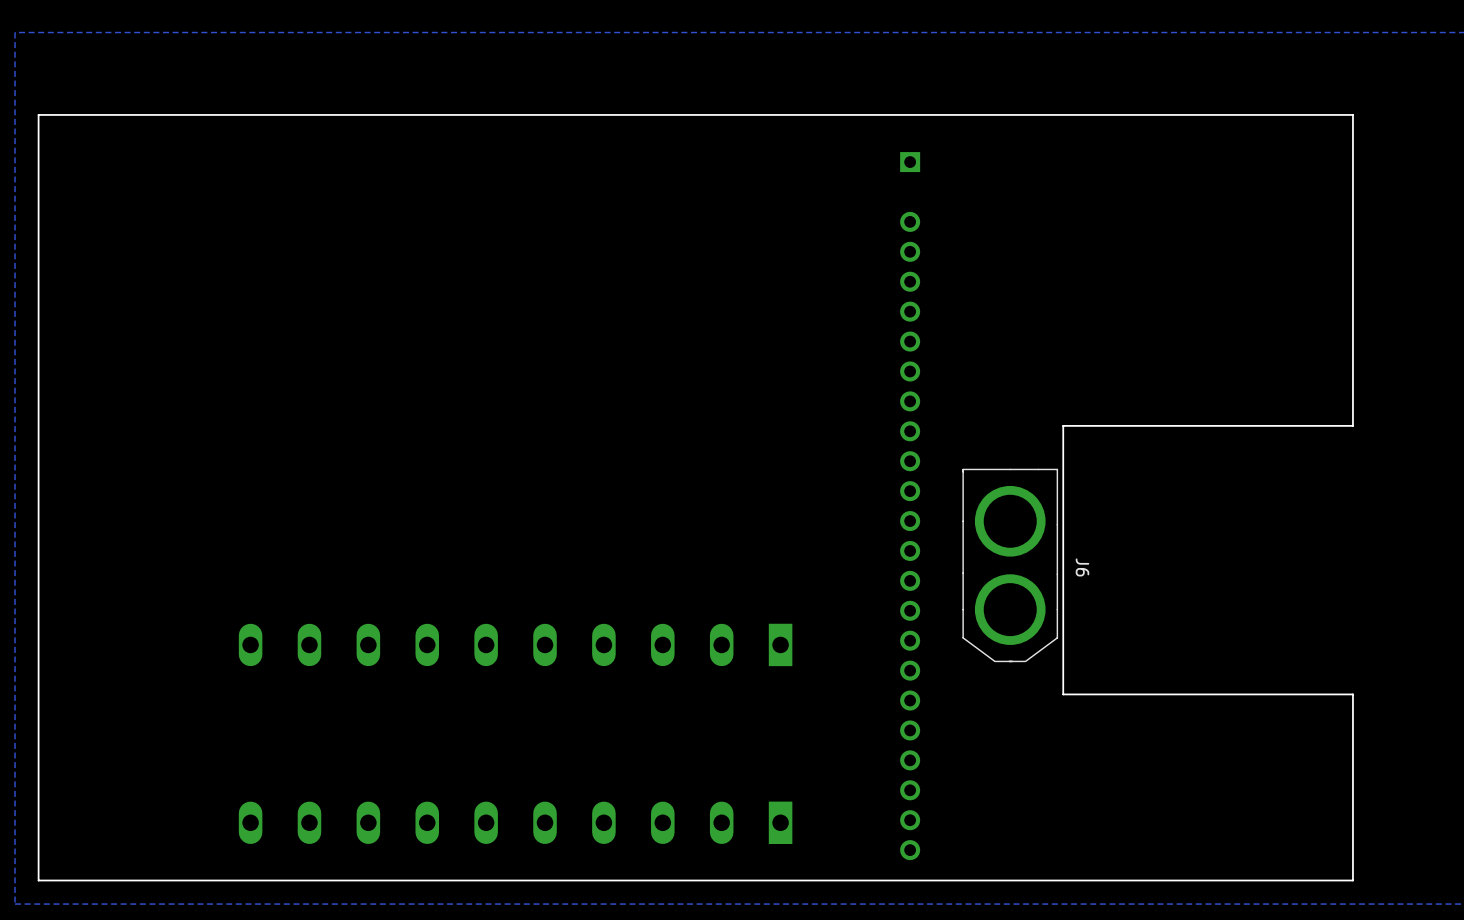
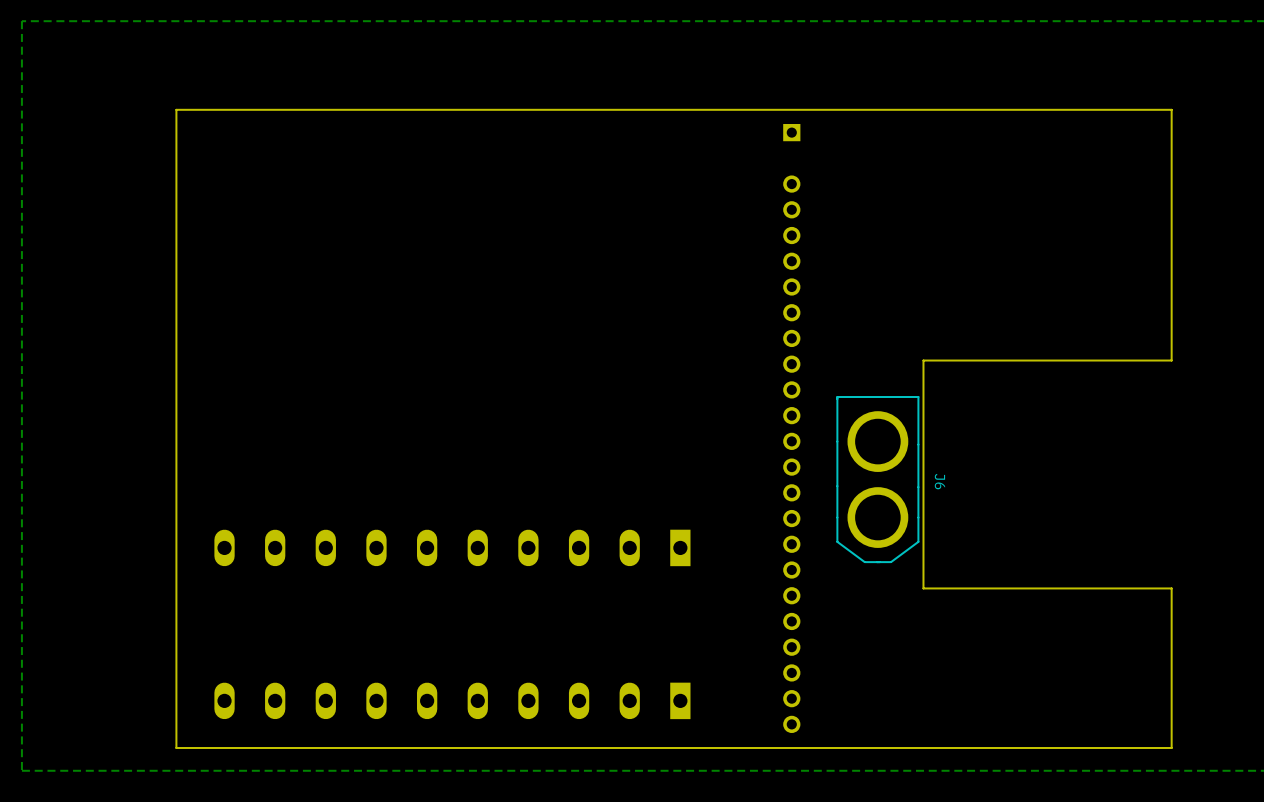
board edge: (1063, 427) (1352, 425) (1352, 114) (38, 114) (38, 880) (1352, 880) (1352, 694) (1063, 694) (1063, 692) -> (923, 360) (1171, 360) (1171, 109) (176, 109) (176, 747) (1171, 747) (1171, 588) (923, 588)

